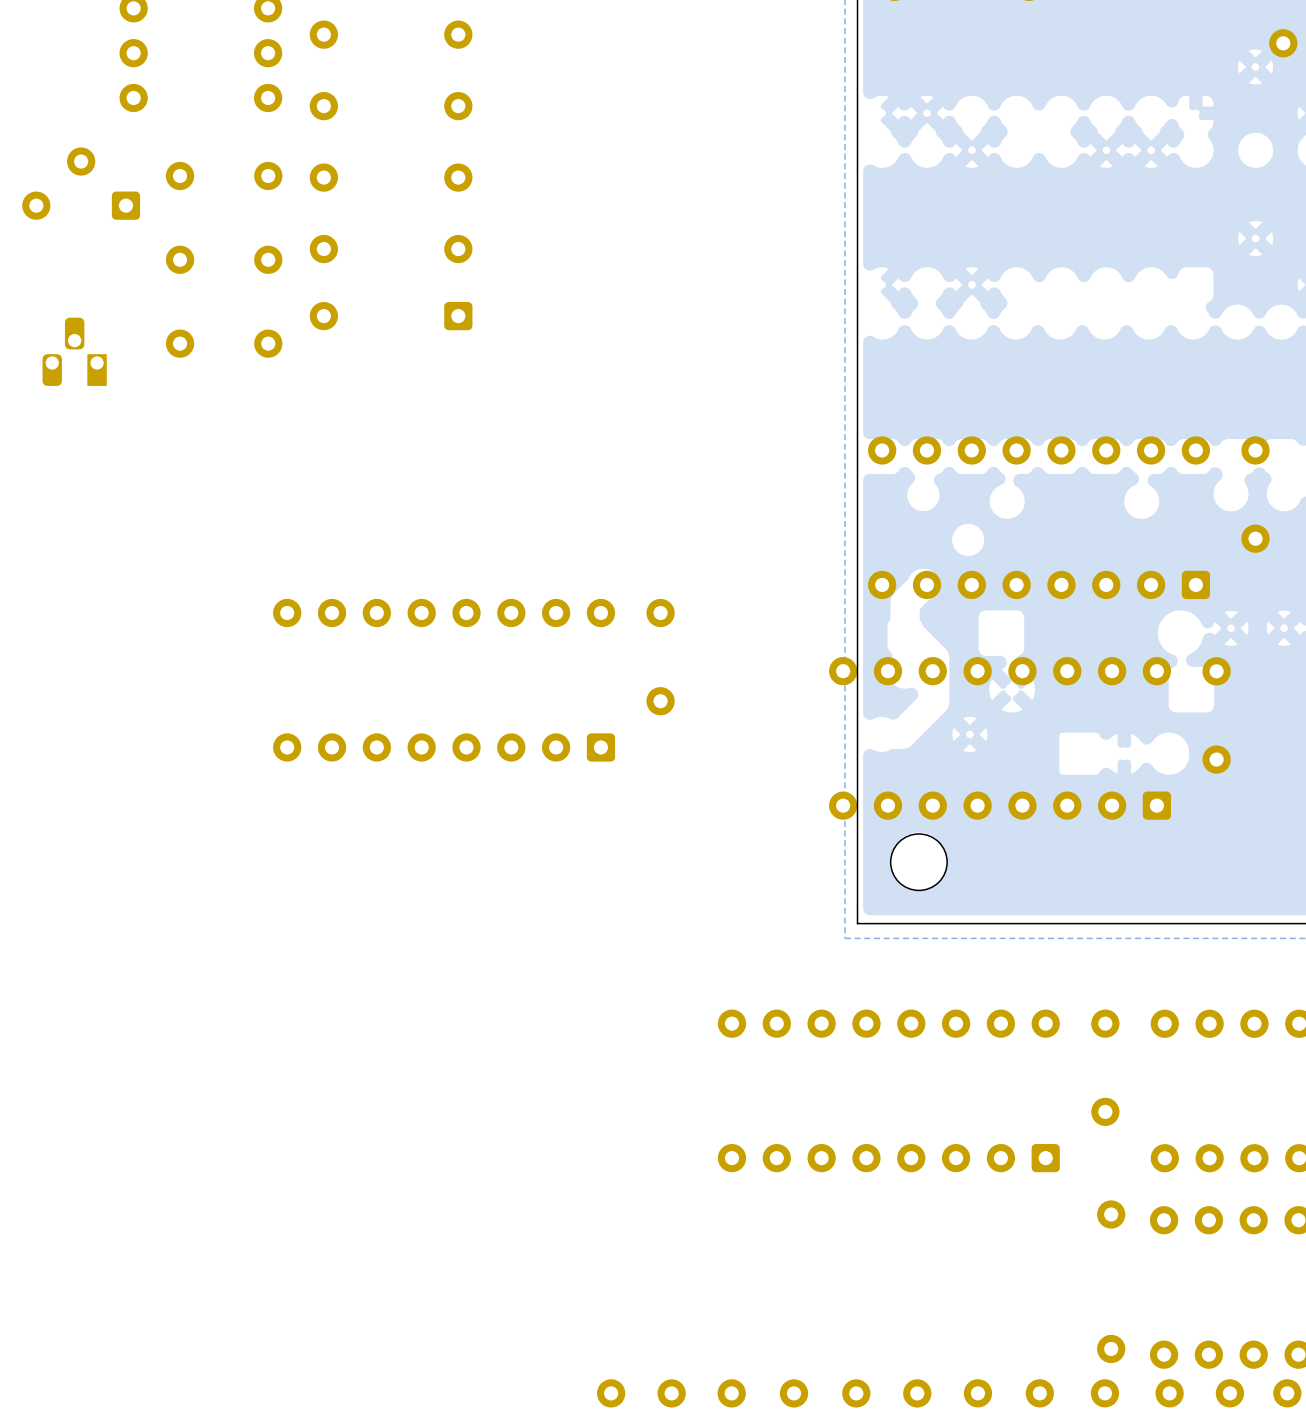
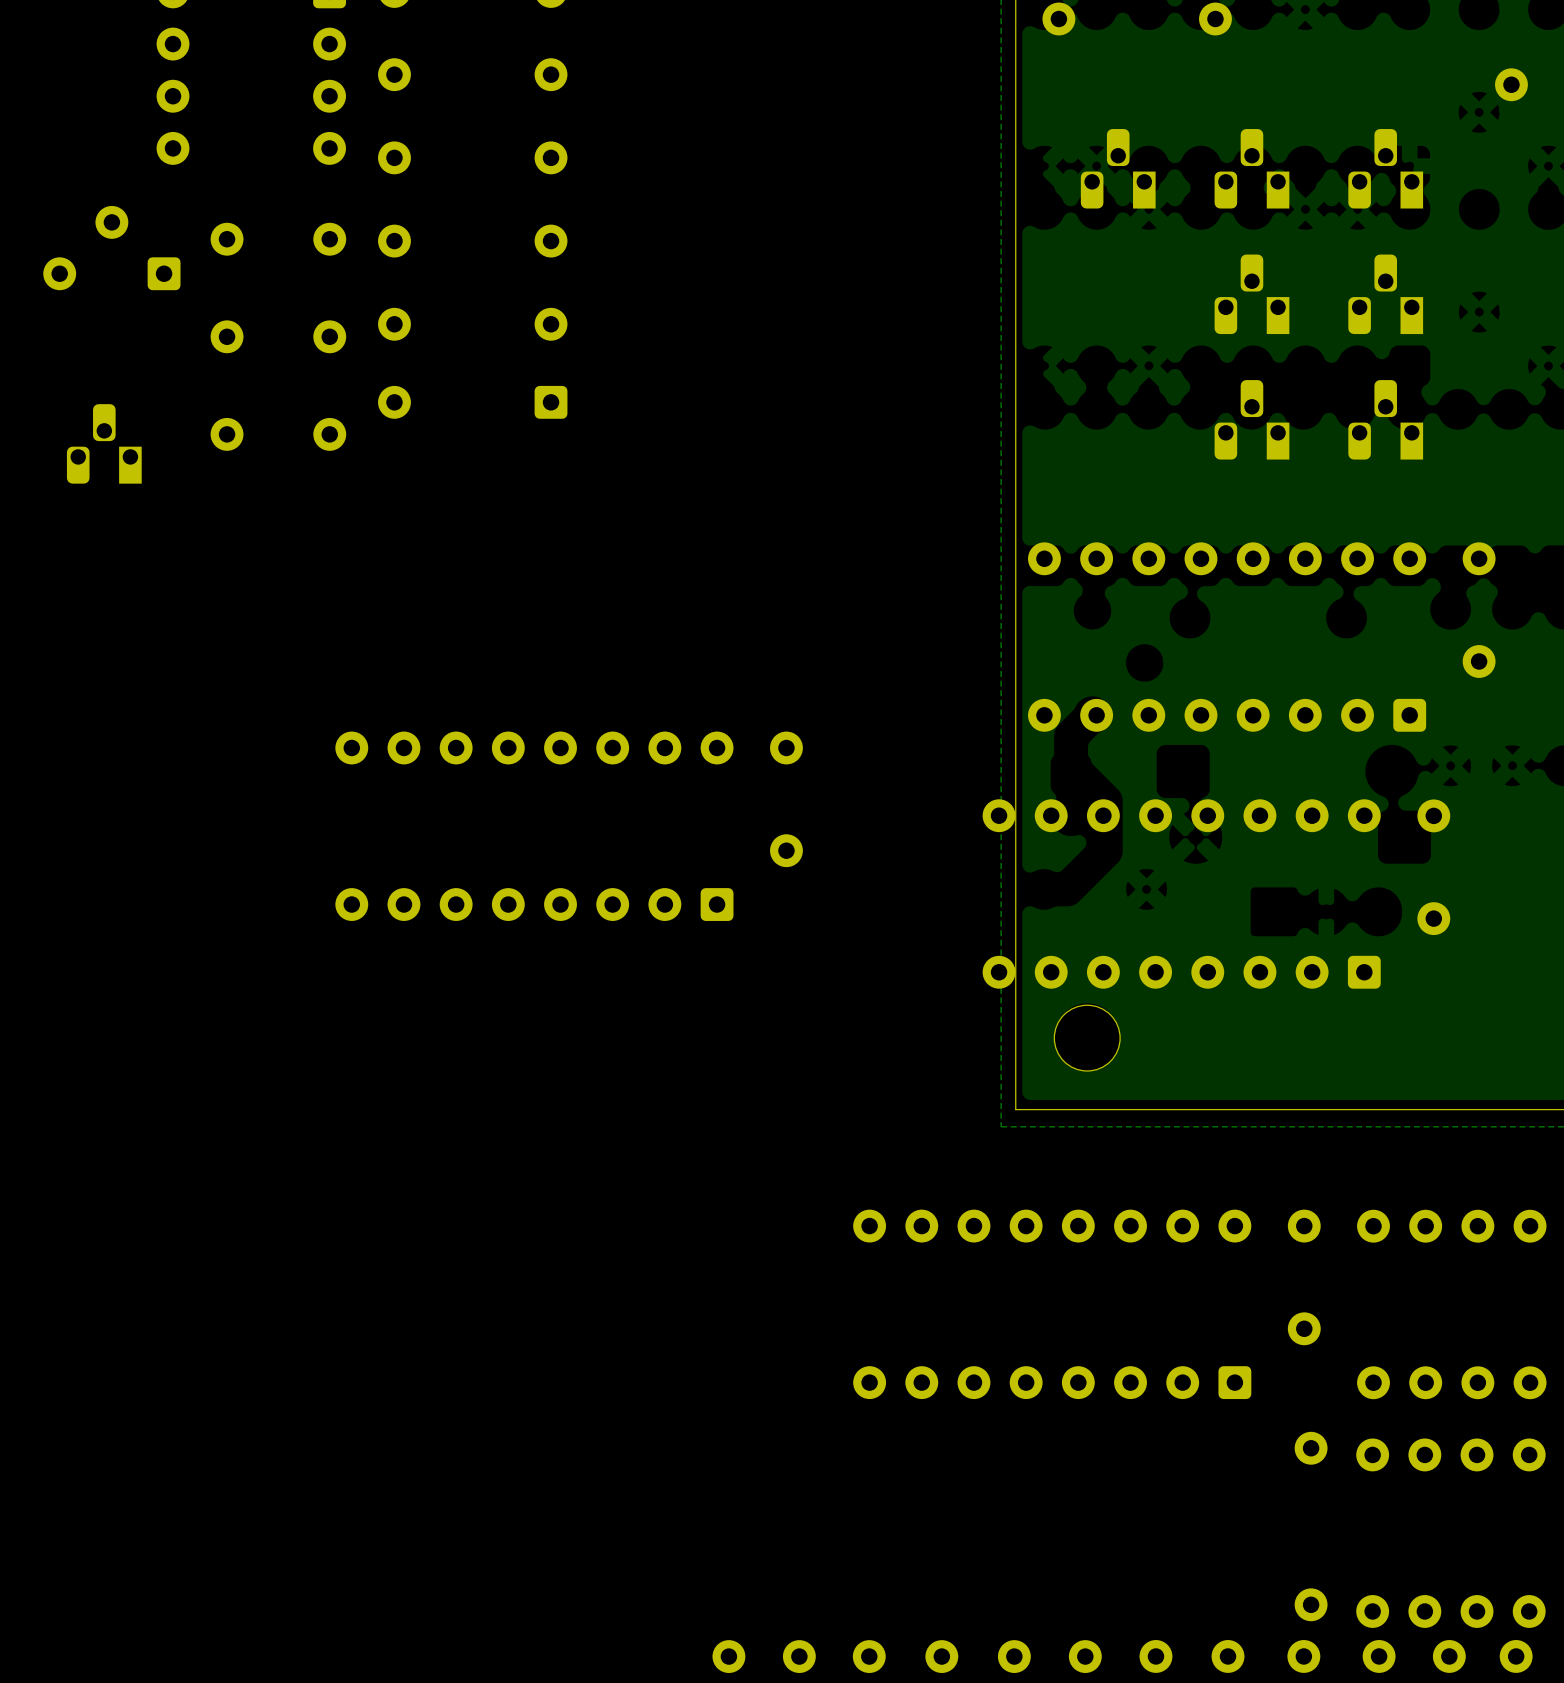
part: none -> (1118, 168)
part: none -> (1251, 168)
part: none -> (1385, 168)
part: none -> (1251, 294)
part: none -> (1385, 294)
part: none -> (1251, 419)
part: none -> (1385, 419)

